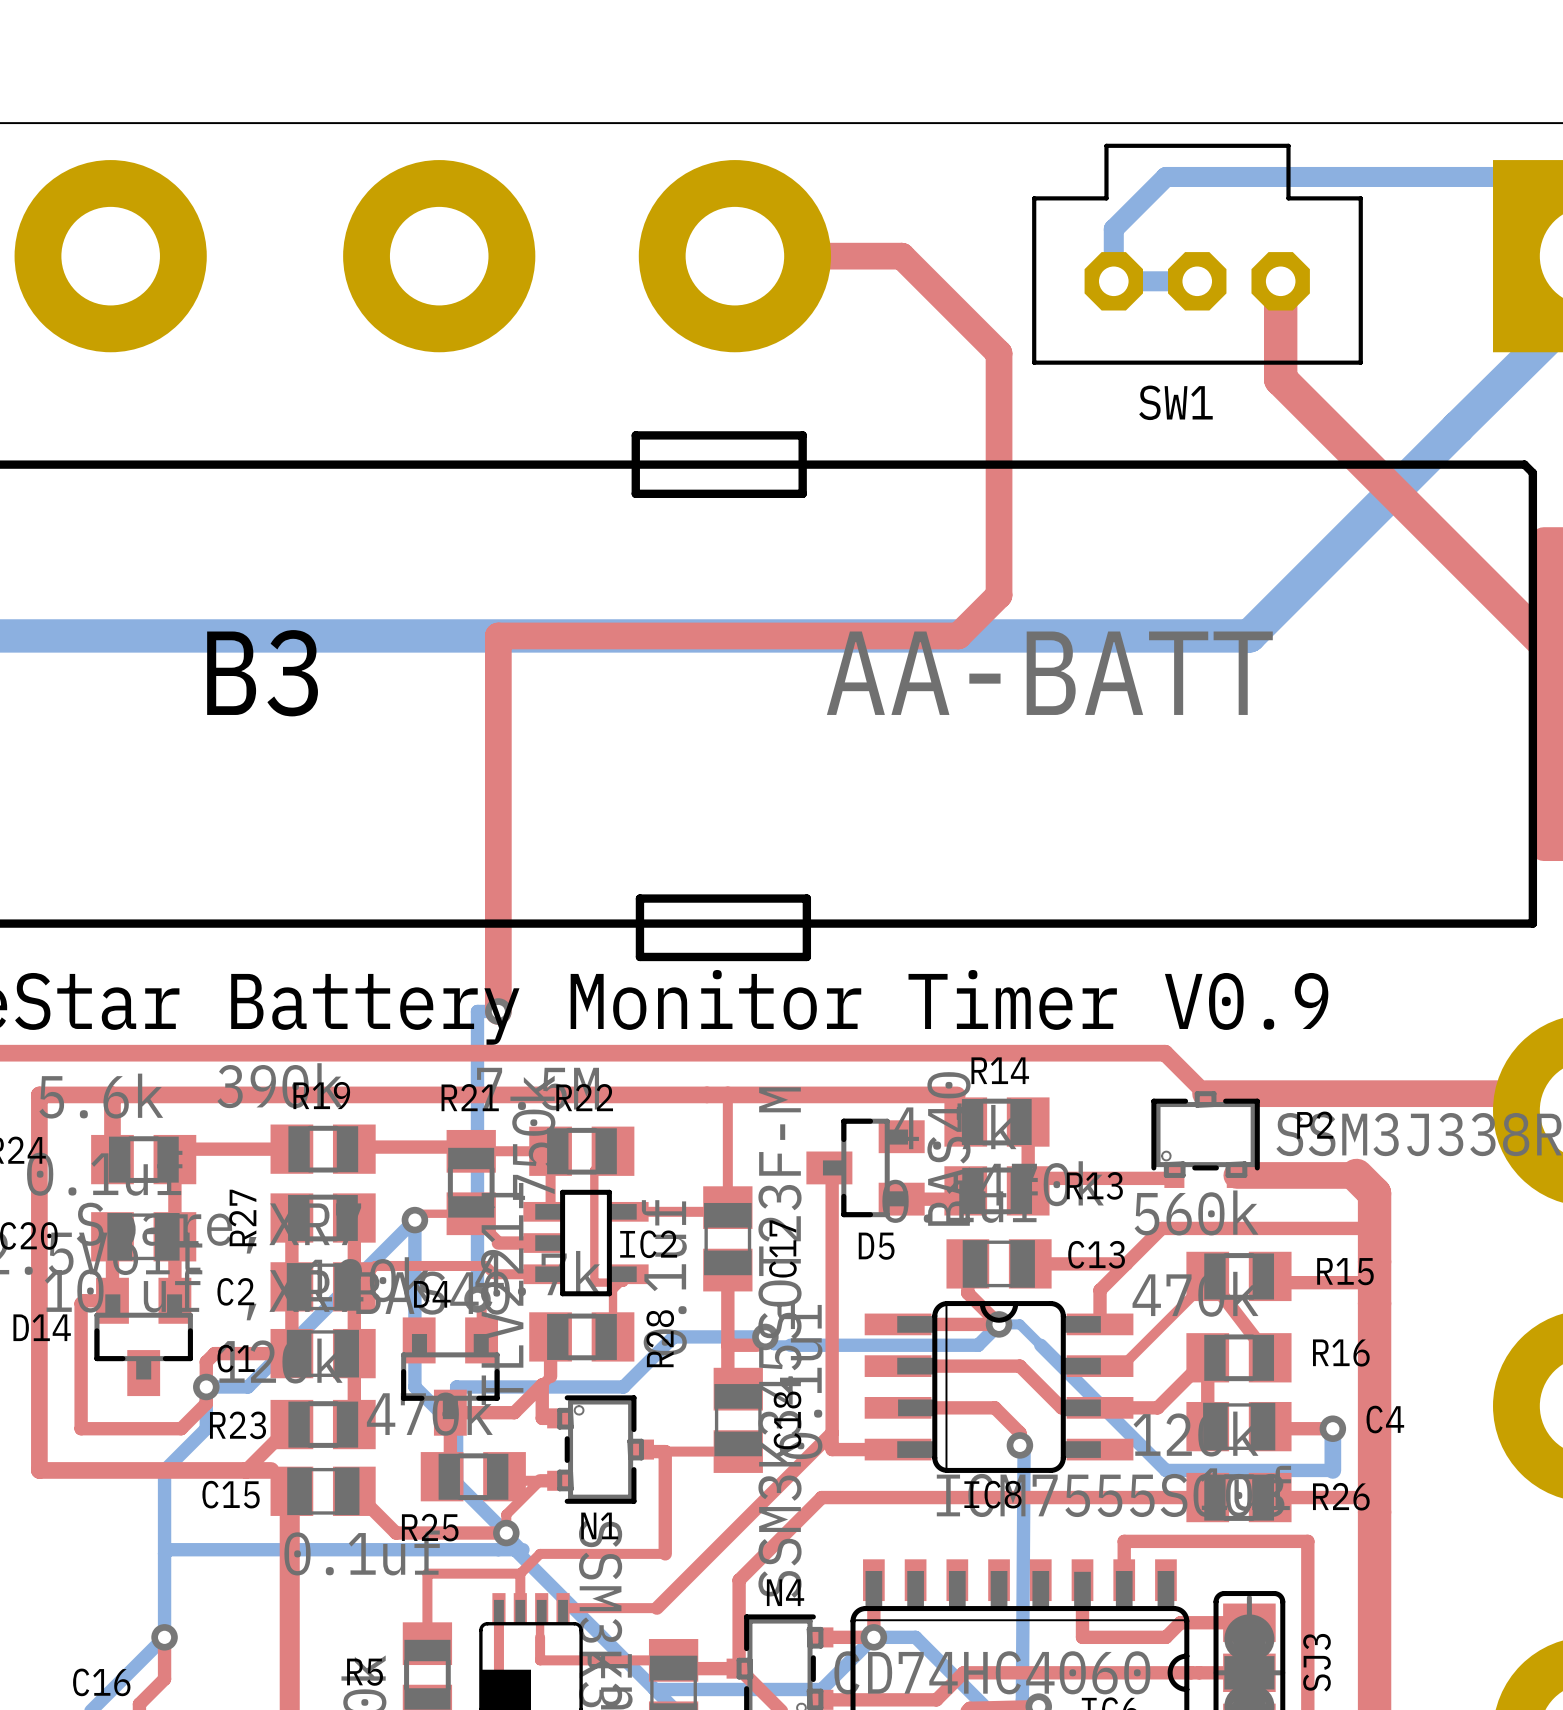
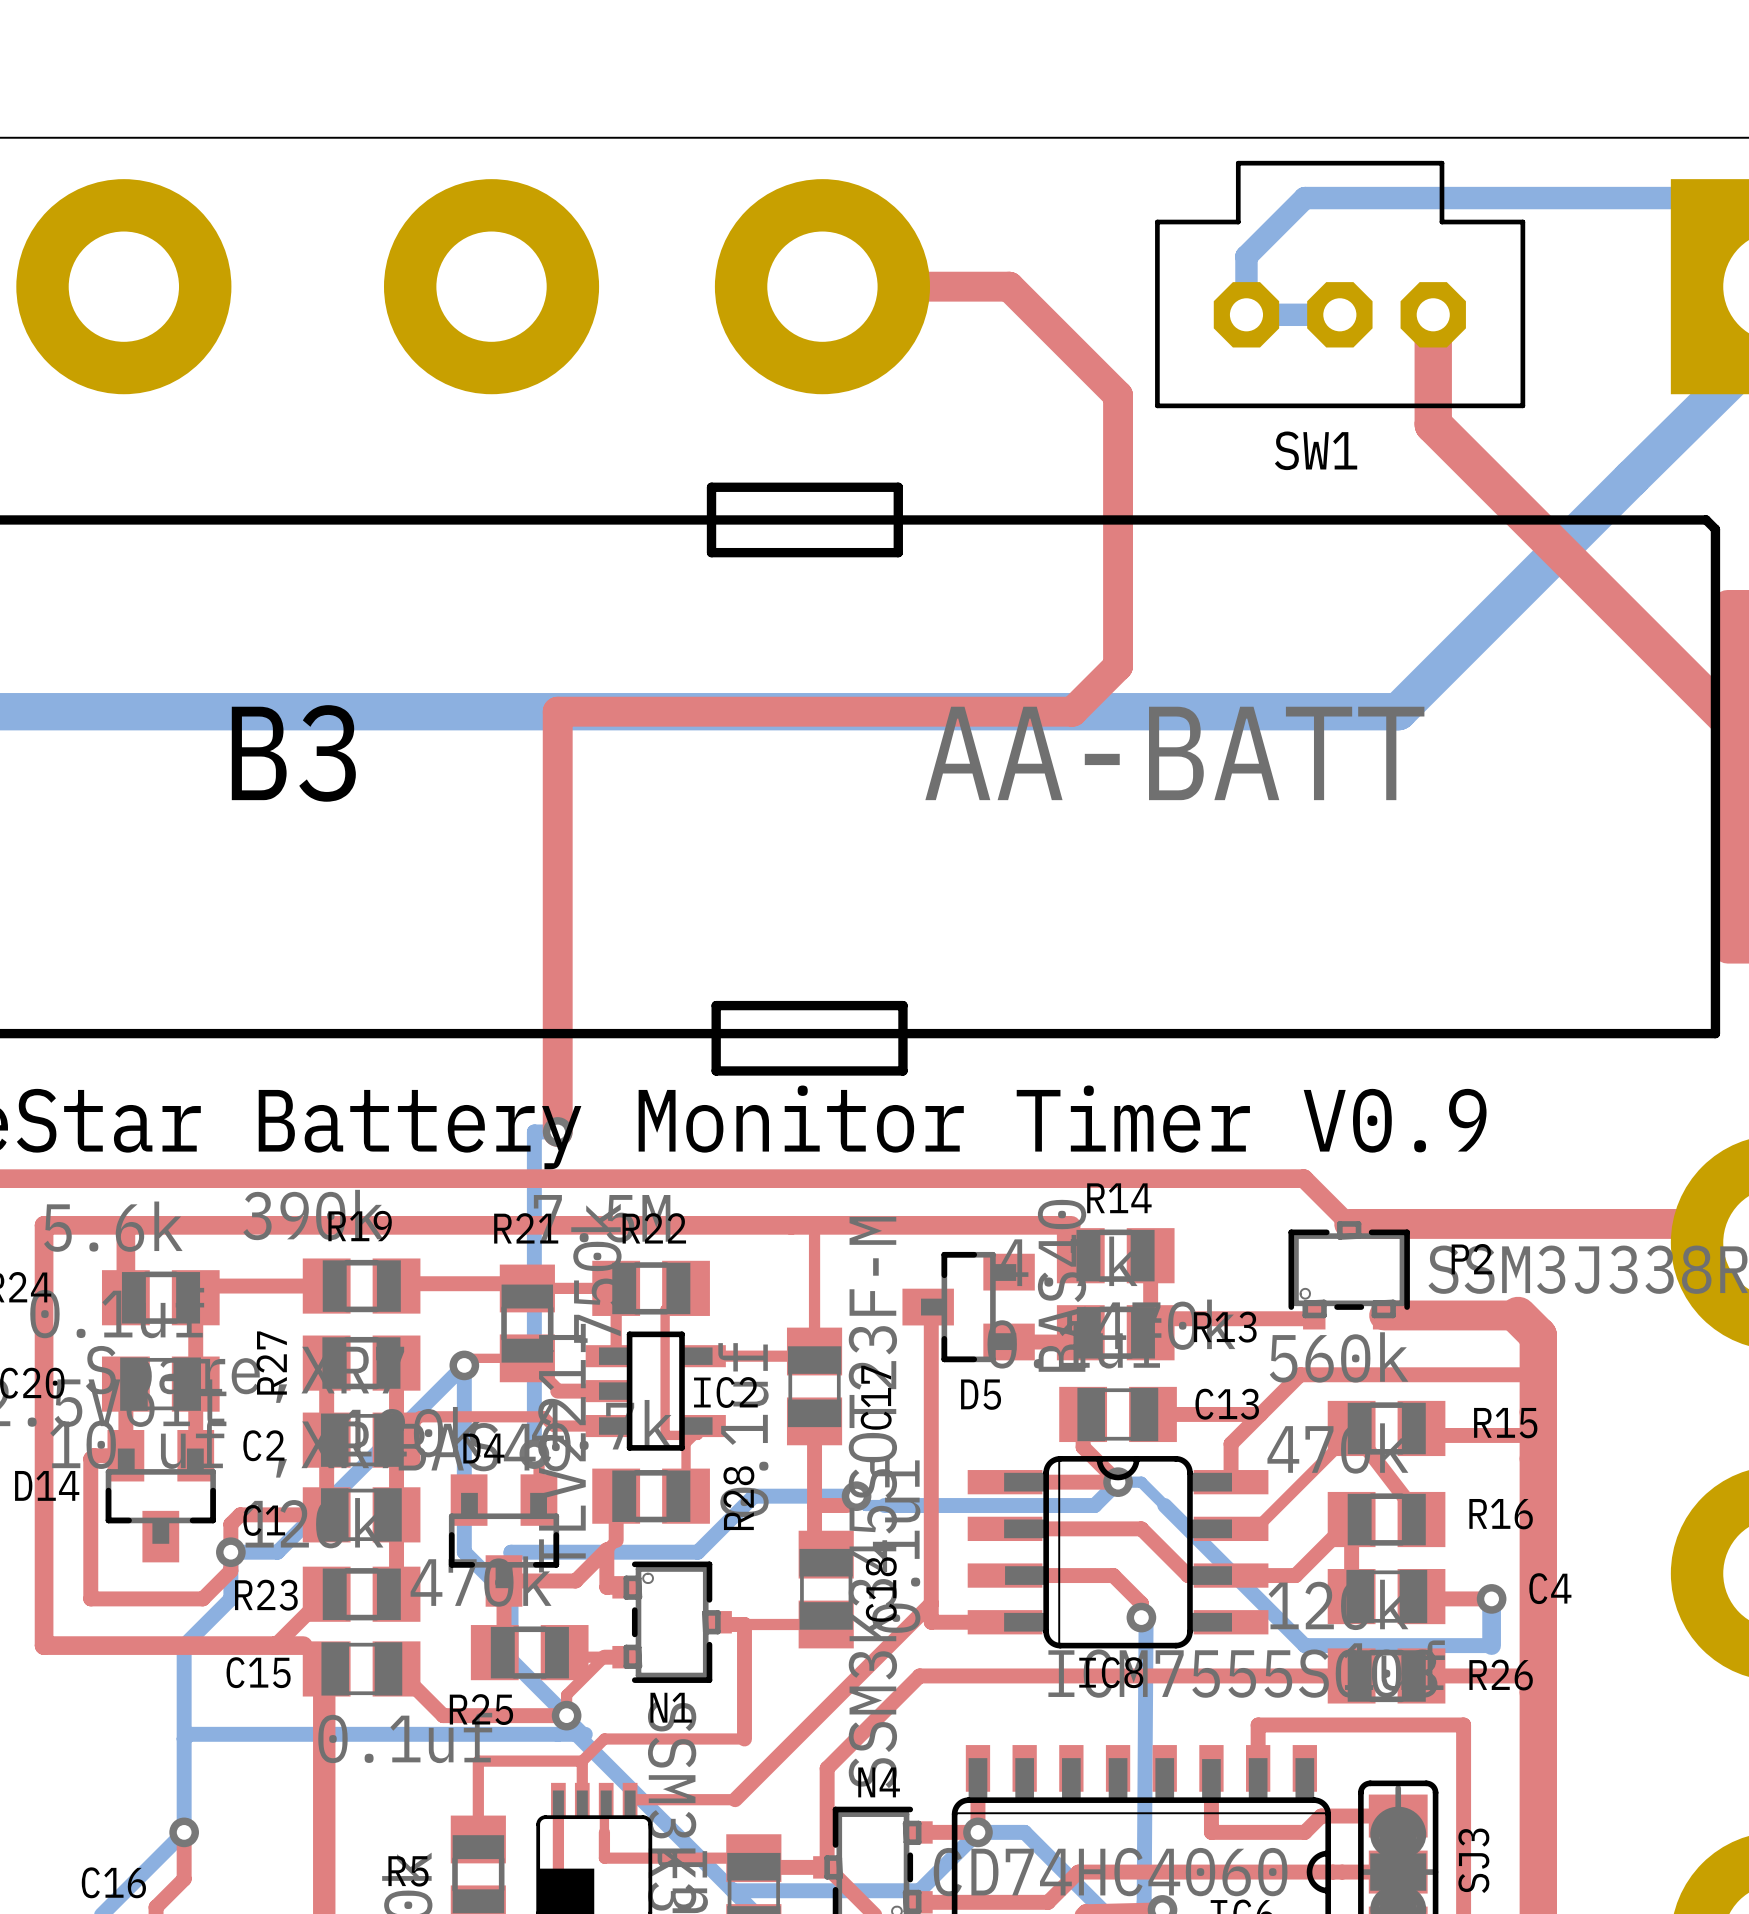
D14 footprint: [94, 1277, 193, 1397] -> [105, 1429, 216, 1563]

